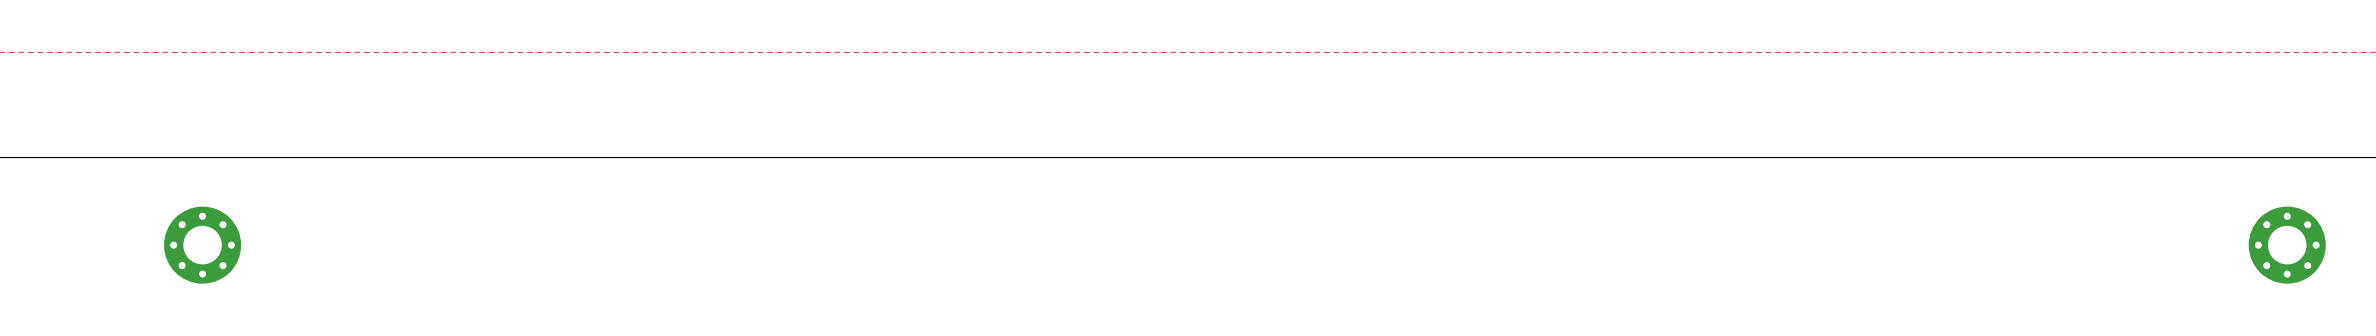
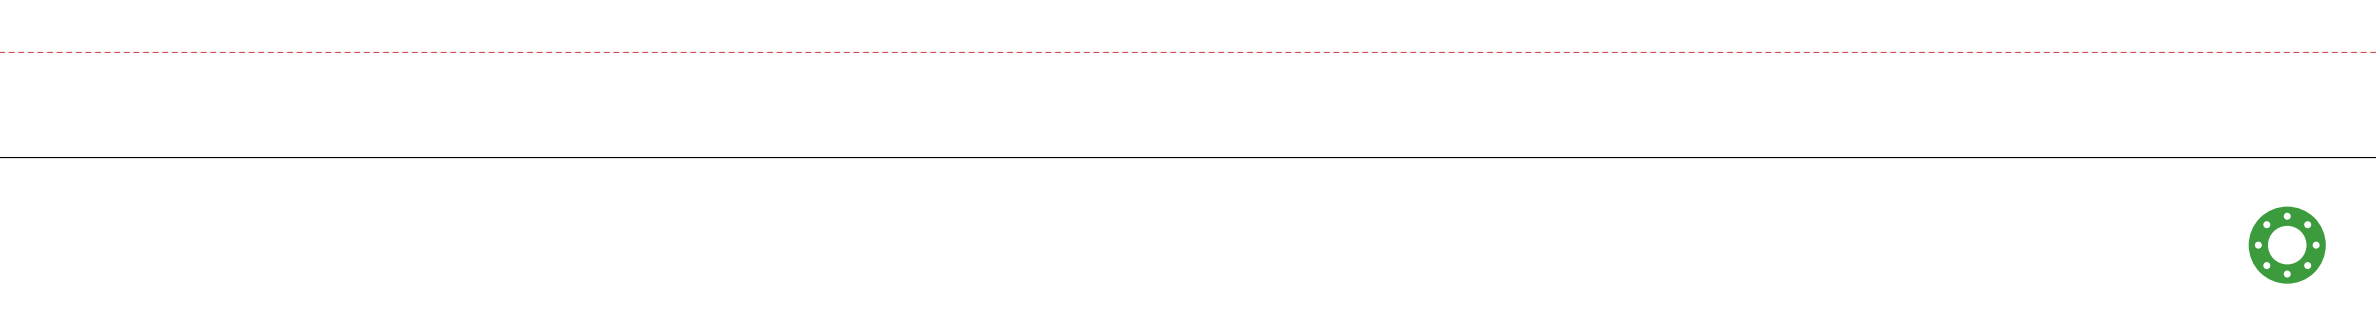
part: (202, 245) -> none

